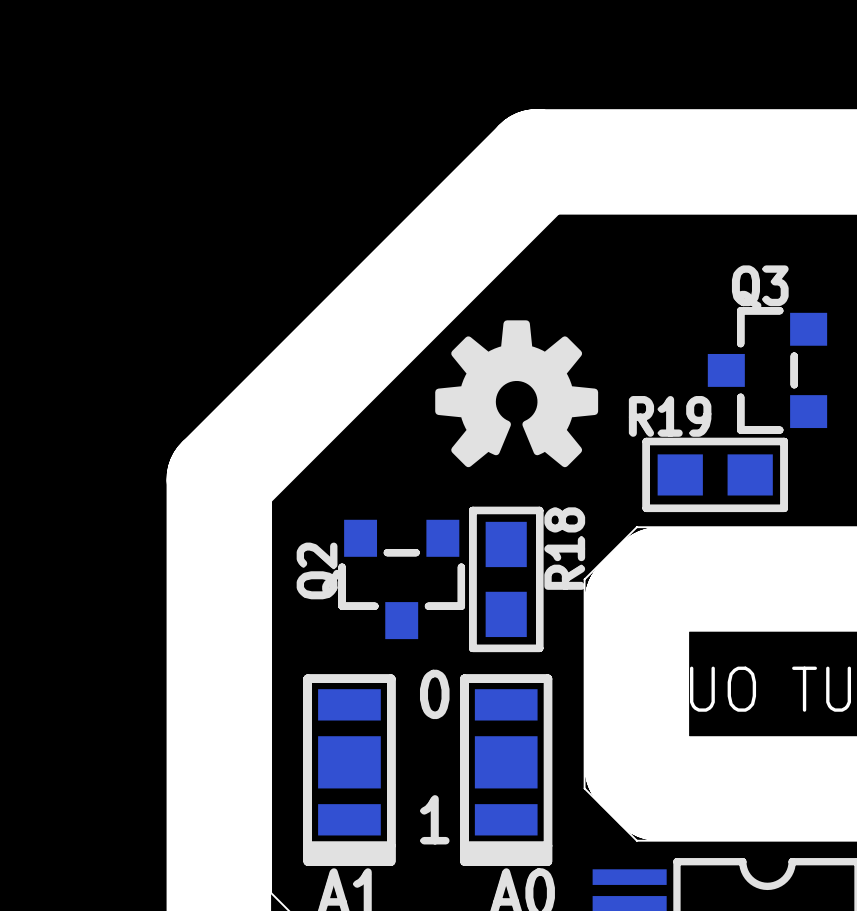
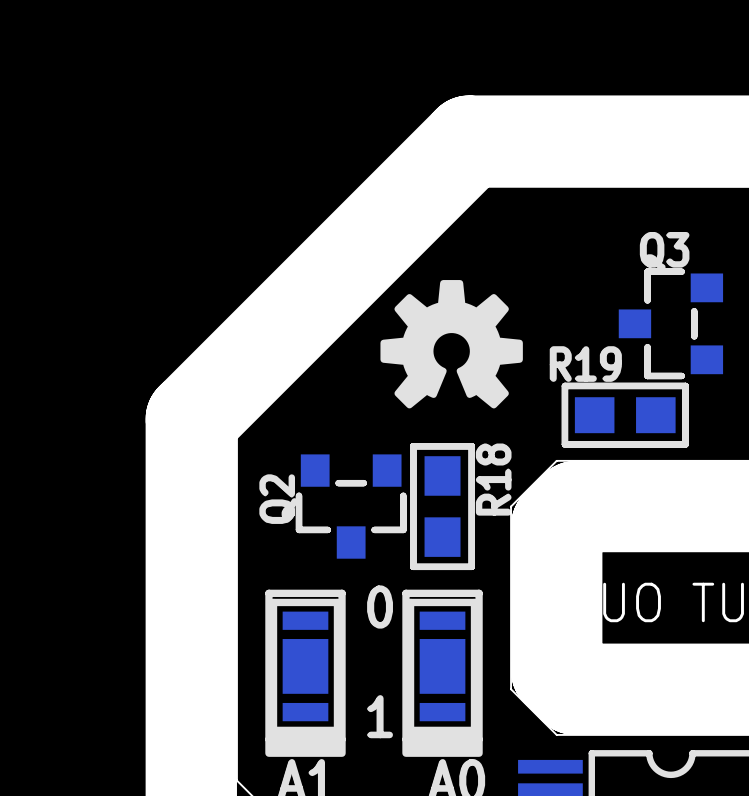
part footprint: [303, 674, 396, 866] -> [269, 598, 342, 748]
part footprint: [460, 674, 553, 866] -> [406, 598, 479, 748]

